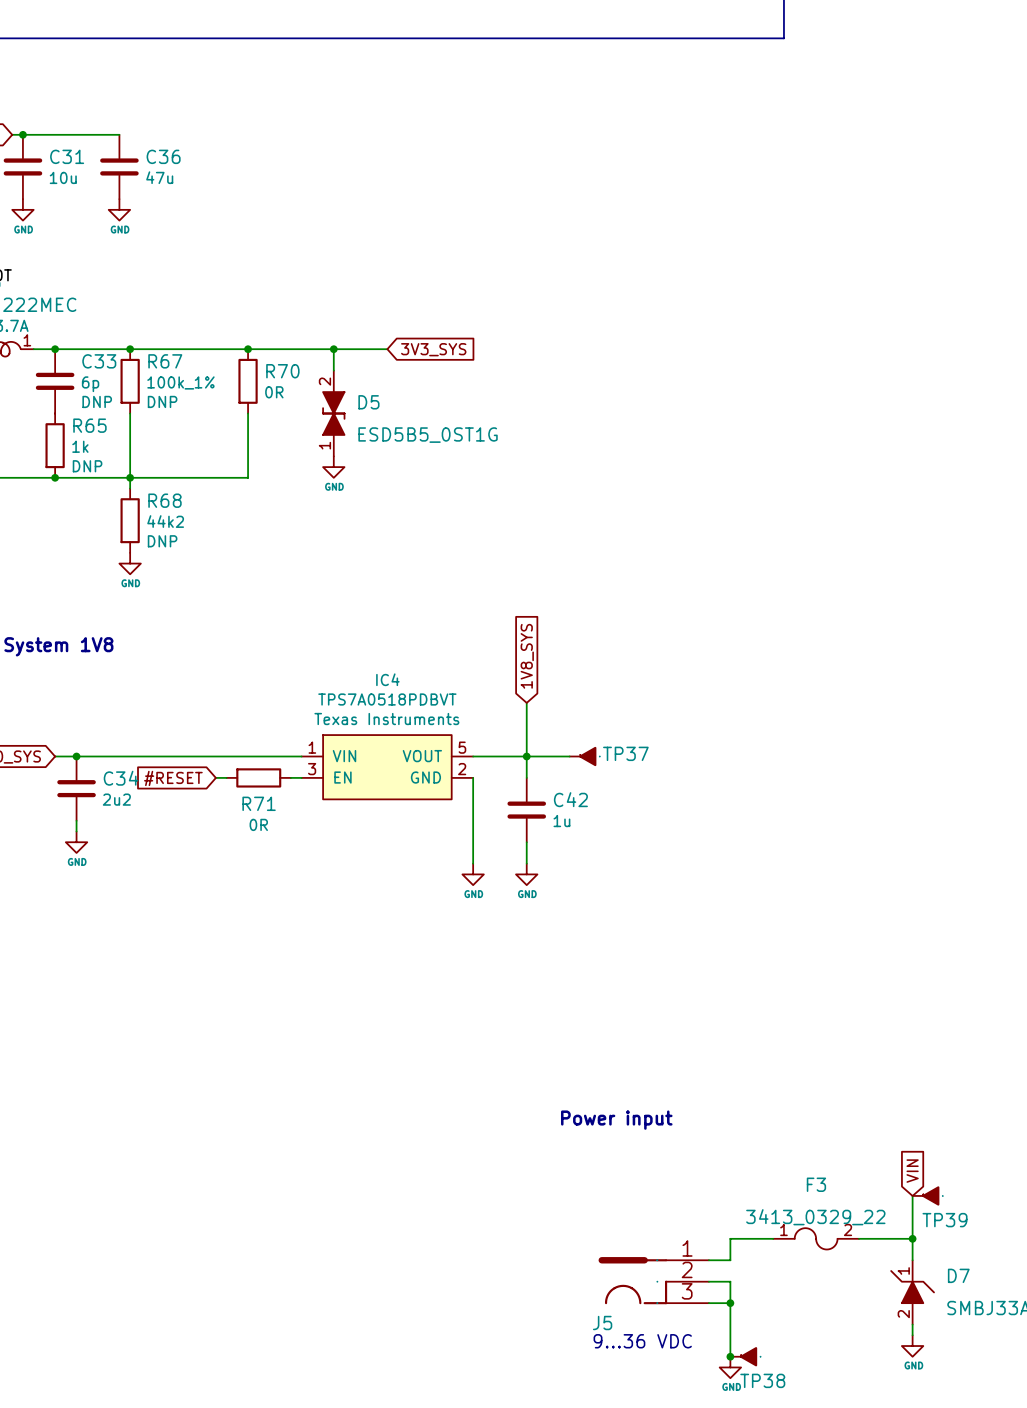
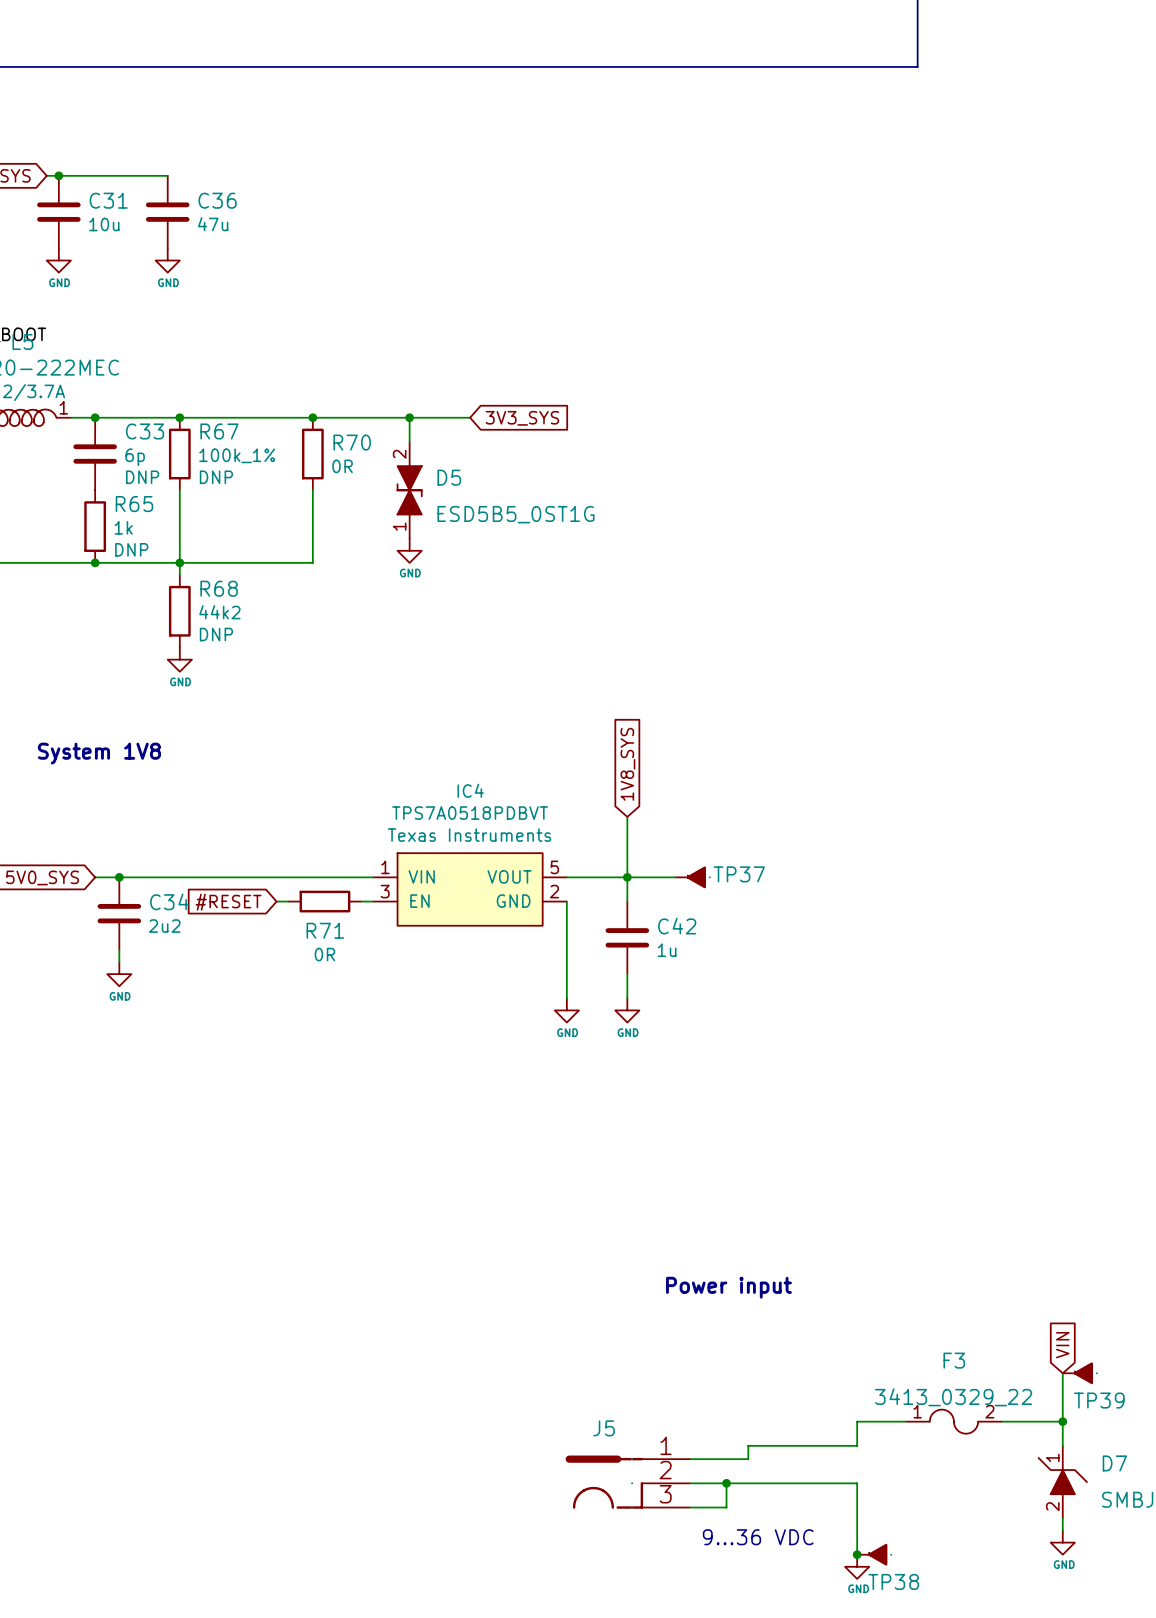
wire: none -> (832, 1445) (748, 1445) (748, 1459) (690, 1459)
J5 position: (653, 1280) -> (627, 1482)
wire: (708, 1281) (730, 1281) (730, 1293) -> (690, 1483) (857, 1483)
wire: none -> (726, 1483) (726, 1507) (690, 1507)
junction: none -> (726, 1483)
wire: (708, 1303) (730, 1303) -> none
junction: (730, 1303) -> none
J5 name position: J5 (602, 1323) -> J5 (604, 1428)

